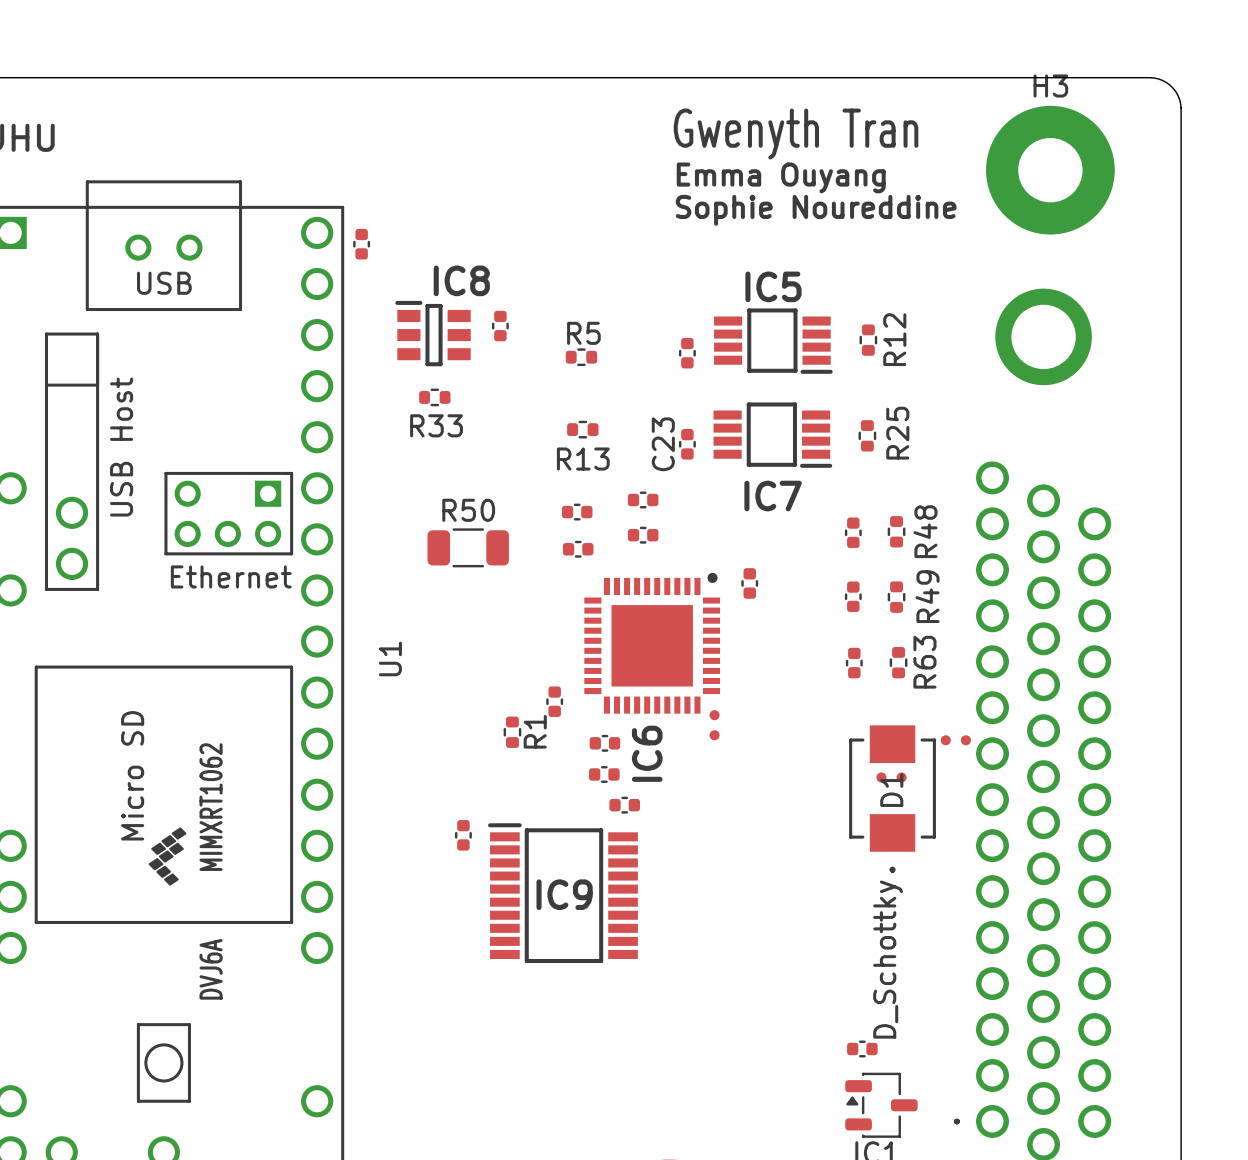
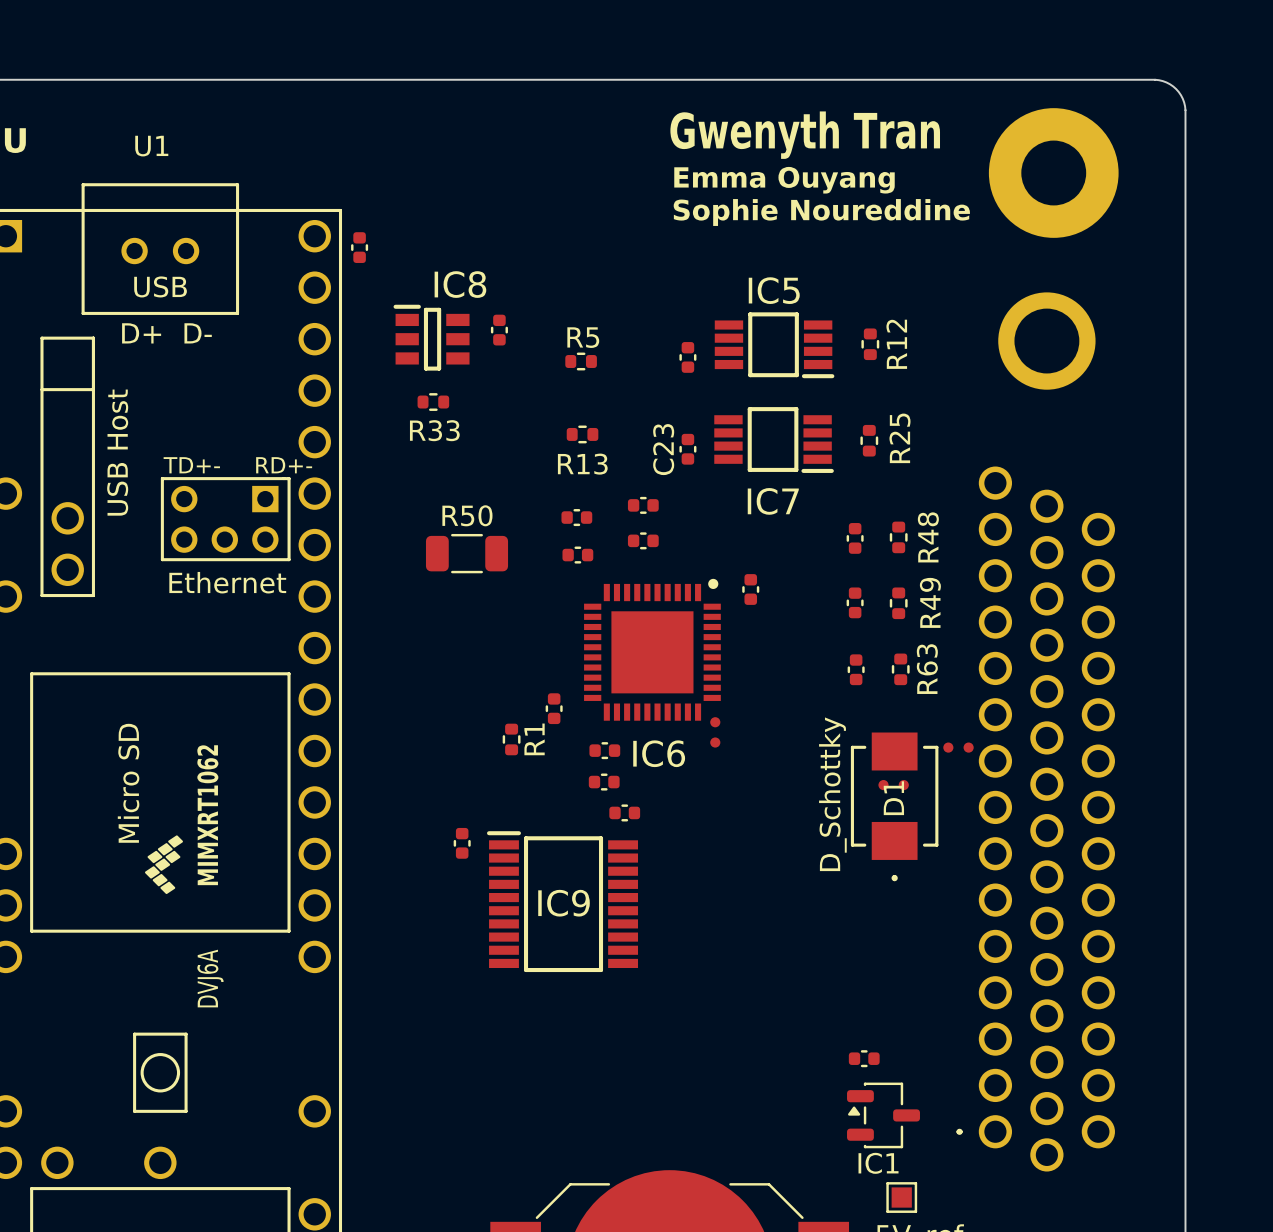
H3 name: H3 (1050, 85) -> none
text: none -> D+ (141, 333)
text: none -> D- (198, 333)
text: none -> TD+- (191, 465)
text: none -> RD+- (284, 465)
U1 name rotation: 0° (390, 658) -> 90° clockwise (151, 146)
U1 name position: U1 (390, 658) -> U1 (151, 146)
IC6 name rotation: 0° (647, 753) -> 90° clockwise (659, 753)
D1 value position: D_Schottky (888, 959) -> D_Schottky (832, 794)

